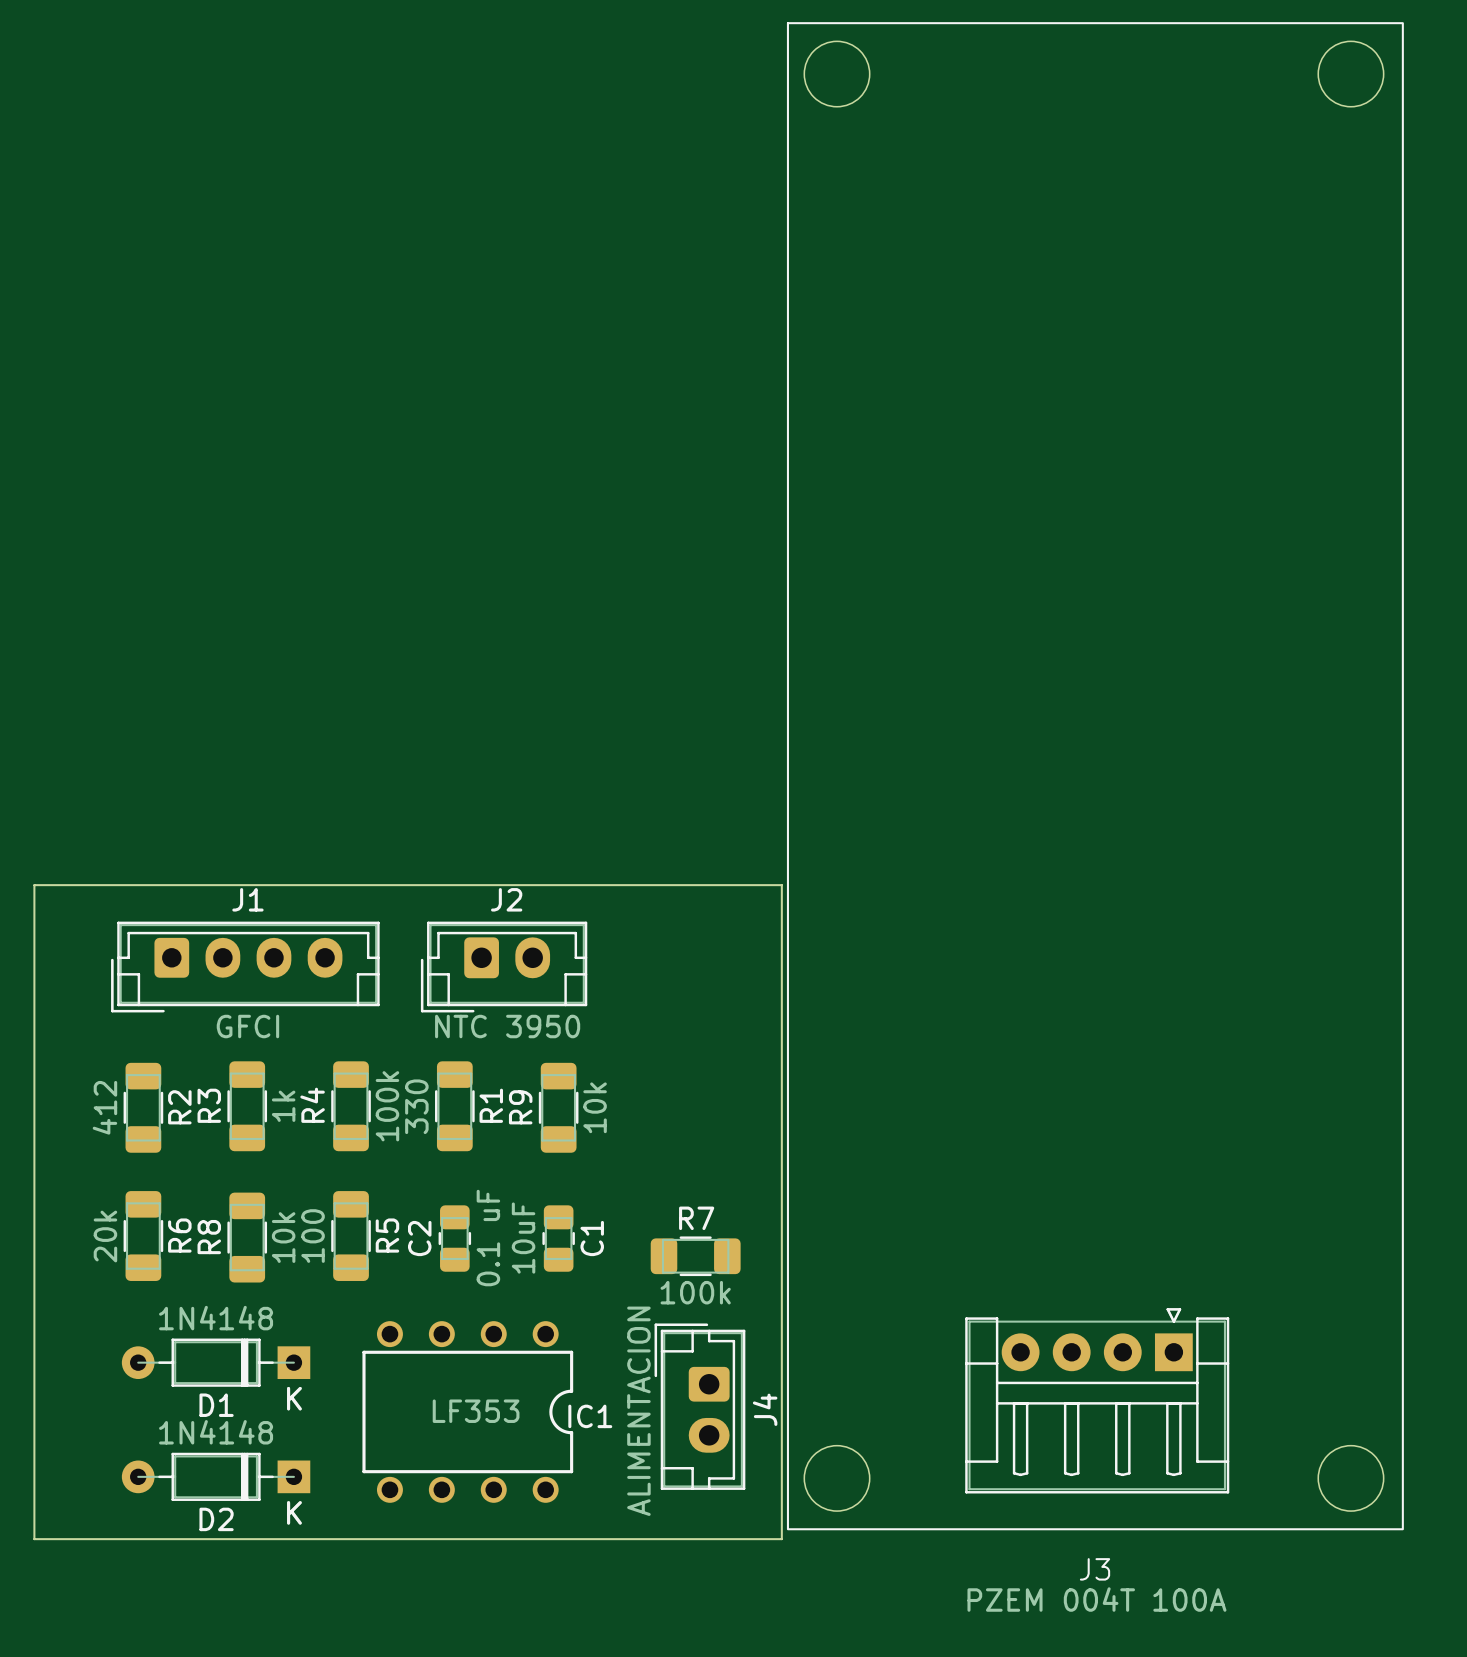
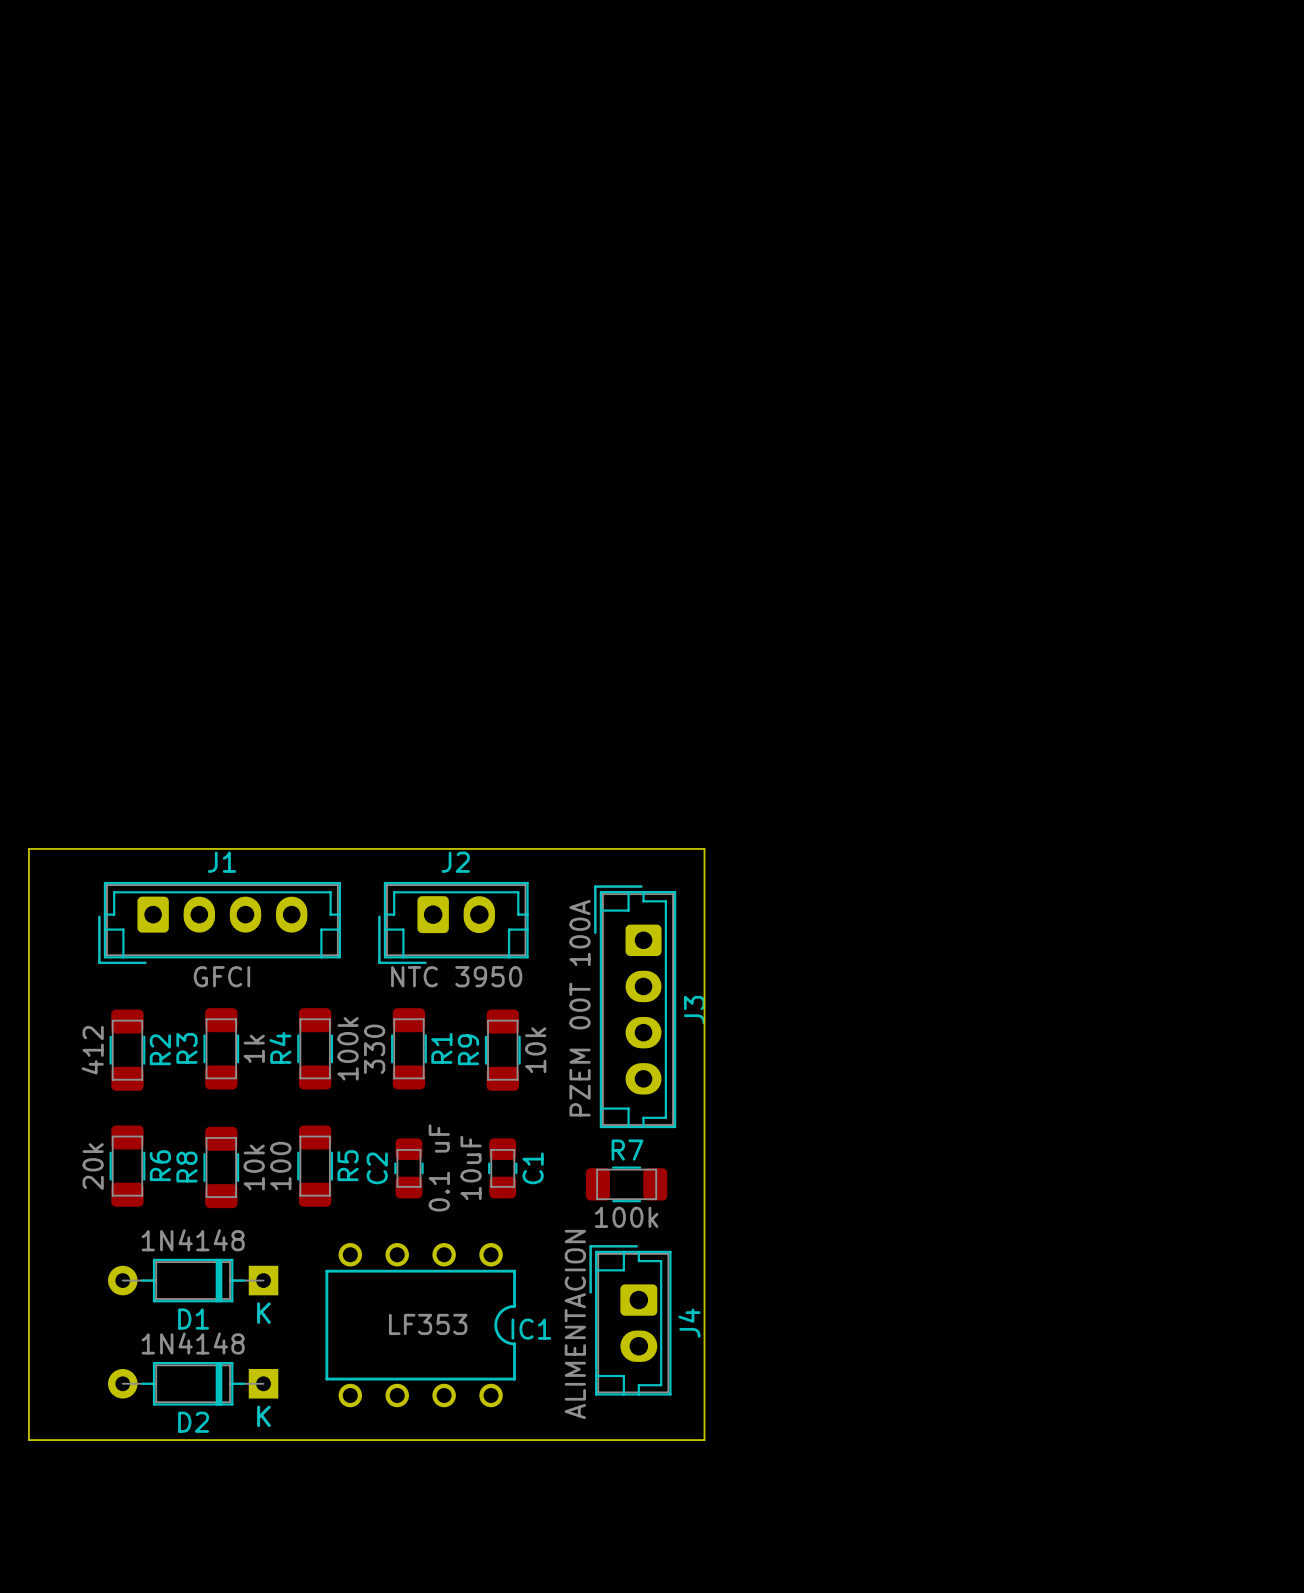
J3 footprint: [786, 22, 1404, 1531] -> [594, 885, 677, 1129]
J3 name position: J3 (1095, 1569) -> J3 (694, 1010)
J3 value: PZEM 004T 100A (1096, 1599) -> PZEM 00T 100A (580, 1008)

